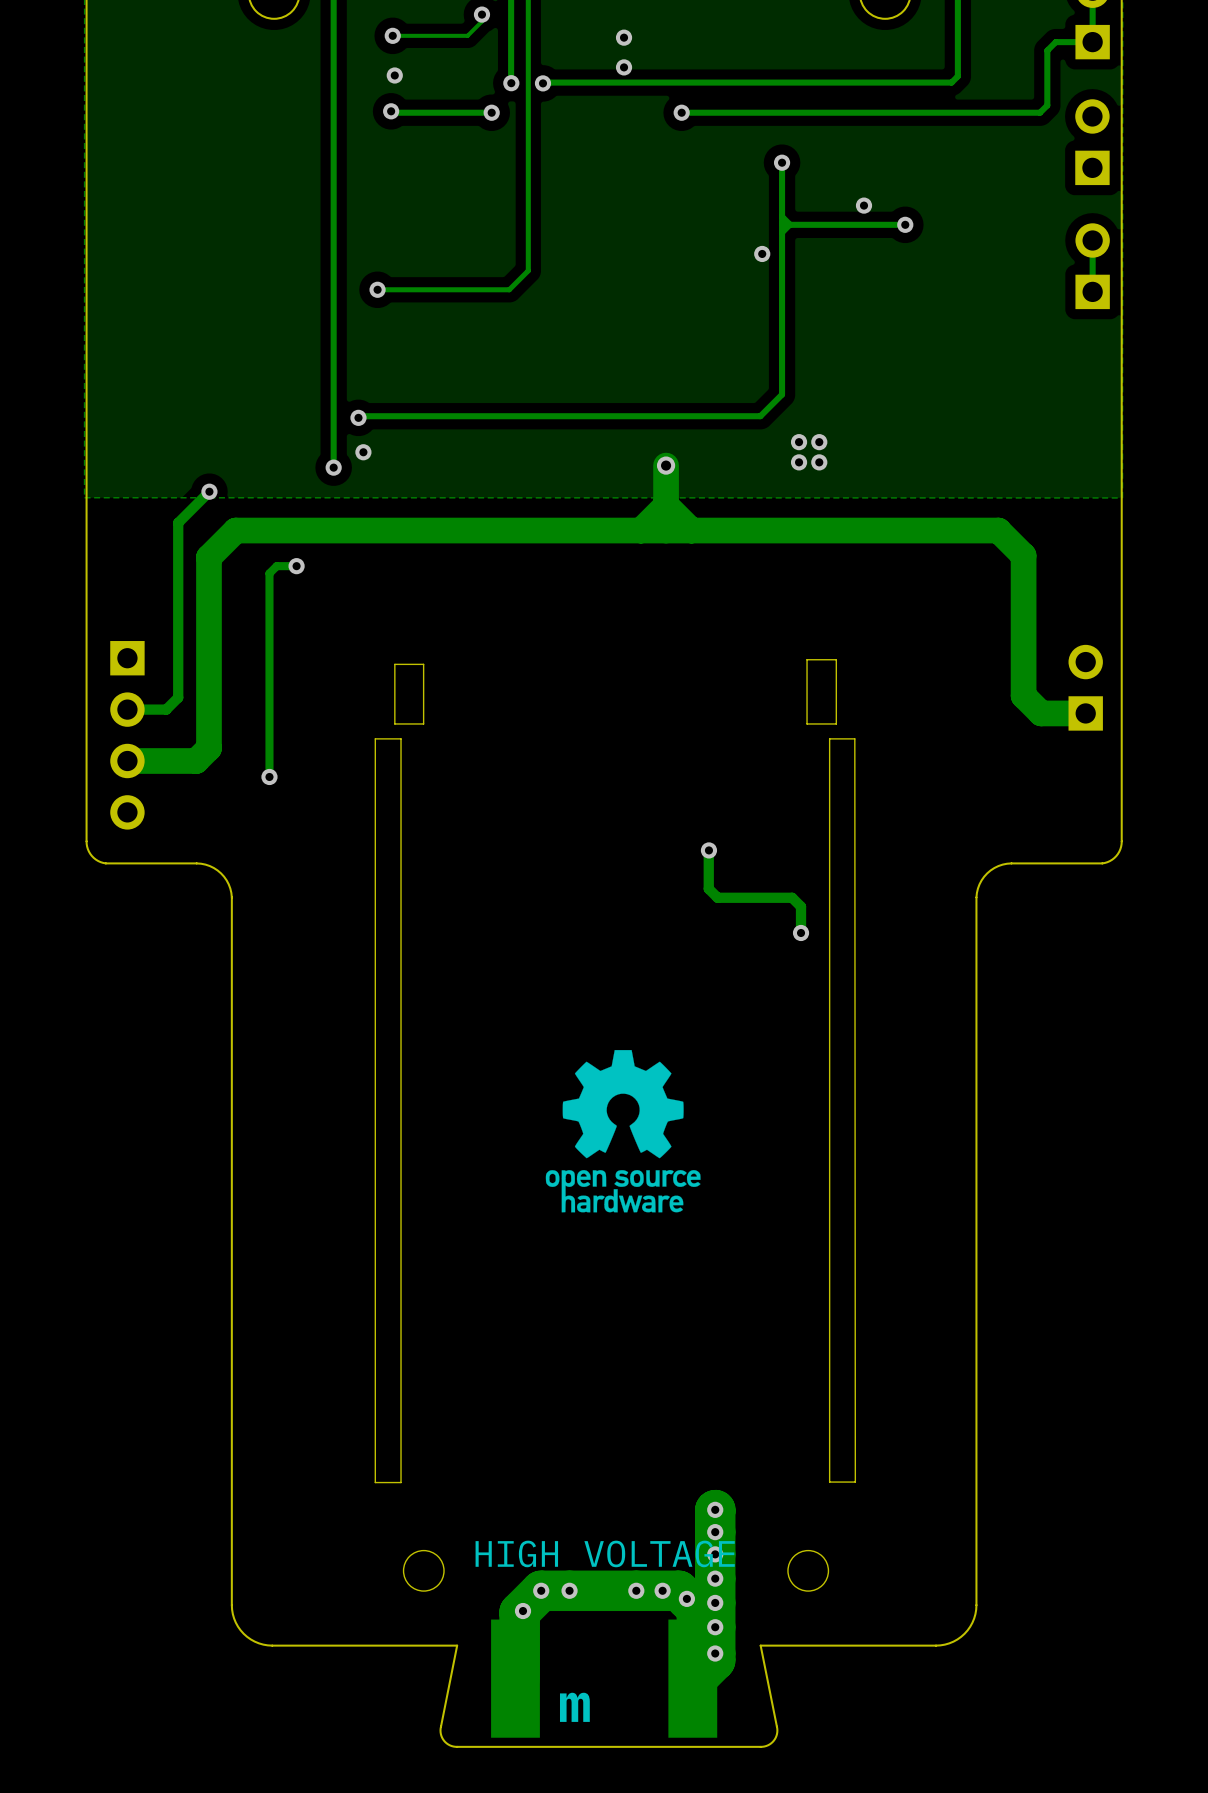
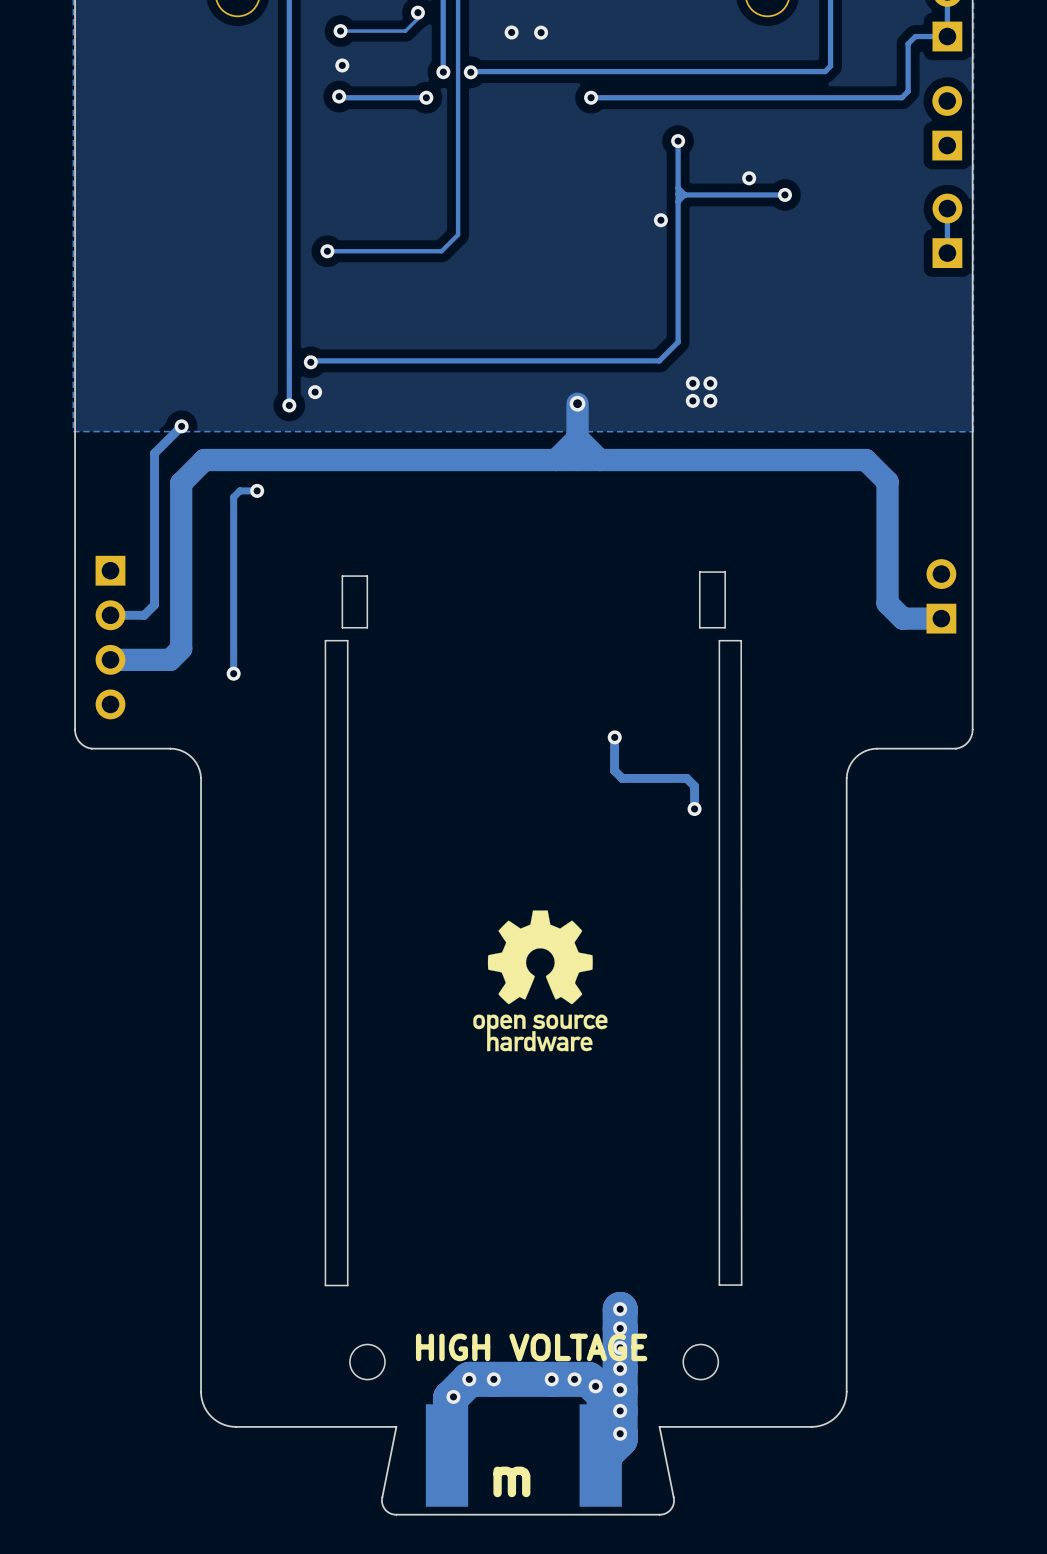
via position: (624, 67) -> (511, 32)

